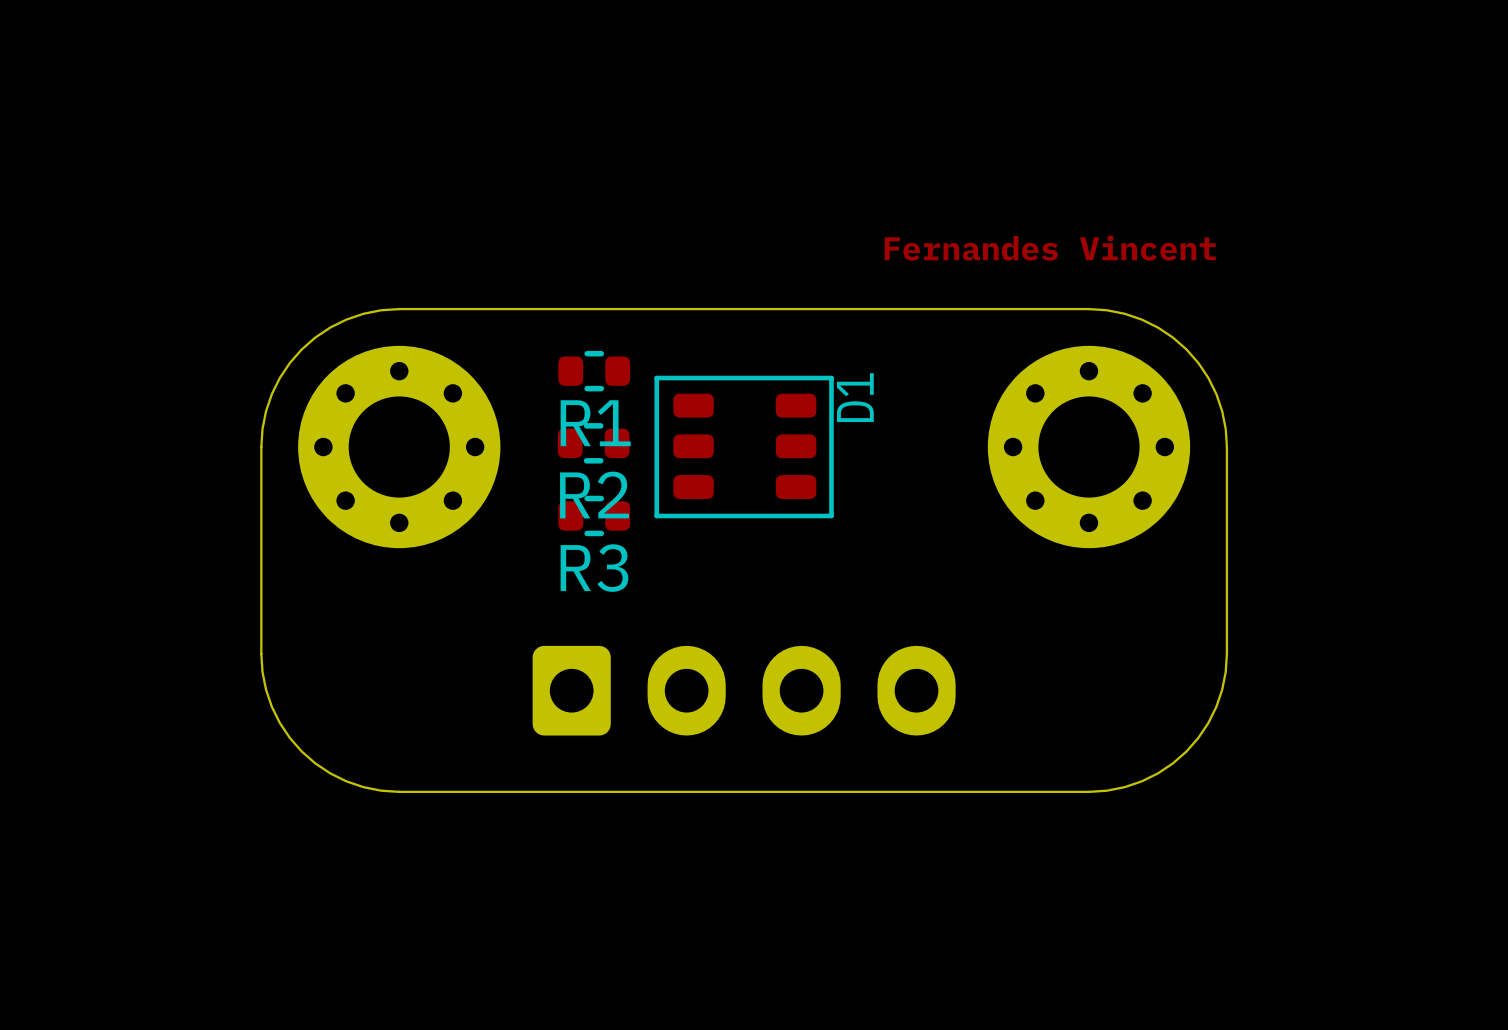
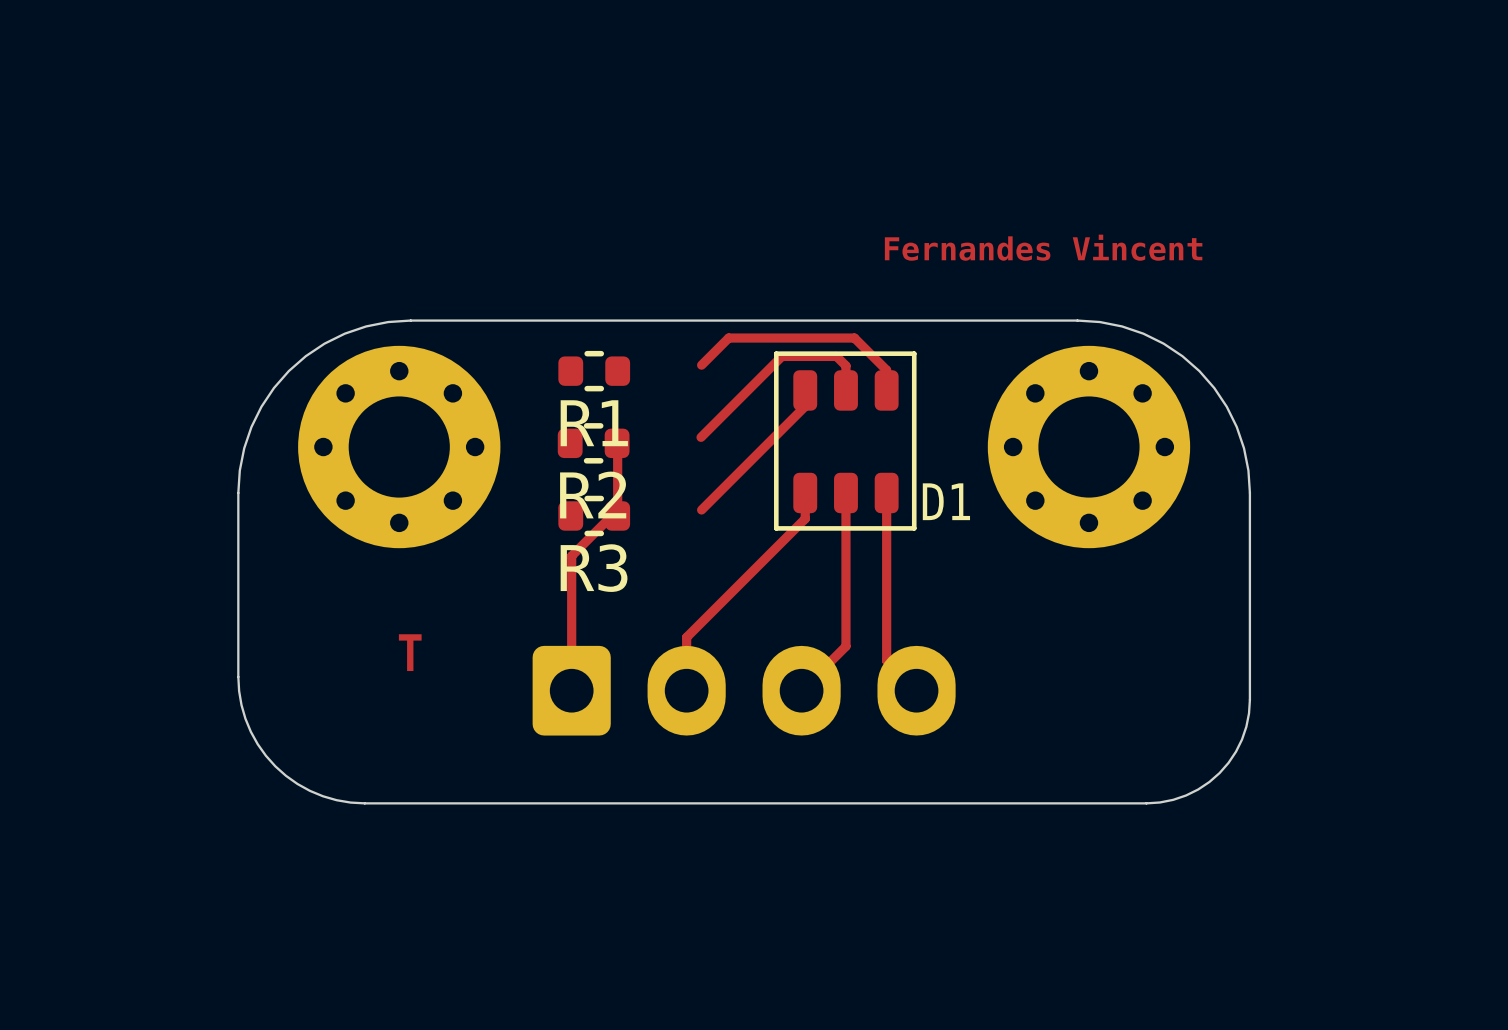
board edge: (399, 309) (1088, 309) (1124, 313) (1157, 327) (1186, 349) (1208, 378) (1222, 411) (1225, 429) (1226, 653) (1222, 689) (1208, 722) (1186, 751) (1157, 773) (1124, 787) (1088, 791) (399, 791) (363, 787) (330, 773) (301, 751) (279, 722) (271, 706) (262, 671) (262, 429) (266, 411) (279, 378) (289, 363) (315, 337) (346, 319) (381, 310) (399, 309) -> (410, 320) (366, 326) (344, 333) (305, 356) (288, 371) (261, 406) (244, 448) (238, 492) (238, 676) (241, 705) (250, 731) (265, 755) (285, 775) (309, 790) (336, 800) (364, 803) (1146, 803) (1173, 799) (1198, 789) (1219, 773) (1236, 751) (1246, 726) (1249, 699) (1248, 470) (1236, 427) (1214, 388) (1182, 356) (1163, 343) (1122, 326) (1077, 320) (410, 320)
track: none -> (701, 365) (728, 338) (854, 338) (886, 370) (886, 390)
track: none -> (805, 390) (805, 406) (701, 510)
track: none -> (845, 390) (845, 365) (836, 356) (781, 356) (701, 437)
track: none -> (617, 437) (617, 510) (571, 555) (571, 690)
D1 rotation: 0° (744, 447) -> 90° clockwise (845, 441)
track: none -> (805, 492) (805, 518) (686, 637) (686, 690)
track: none -> (845, 492) (845, 646) (801, 690)
track: none -> (886, 492) (886, 660) (916, 690)
text: none -> T (410, 652)

